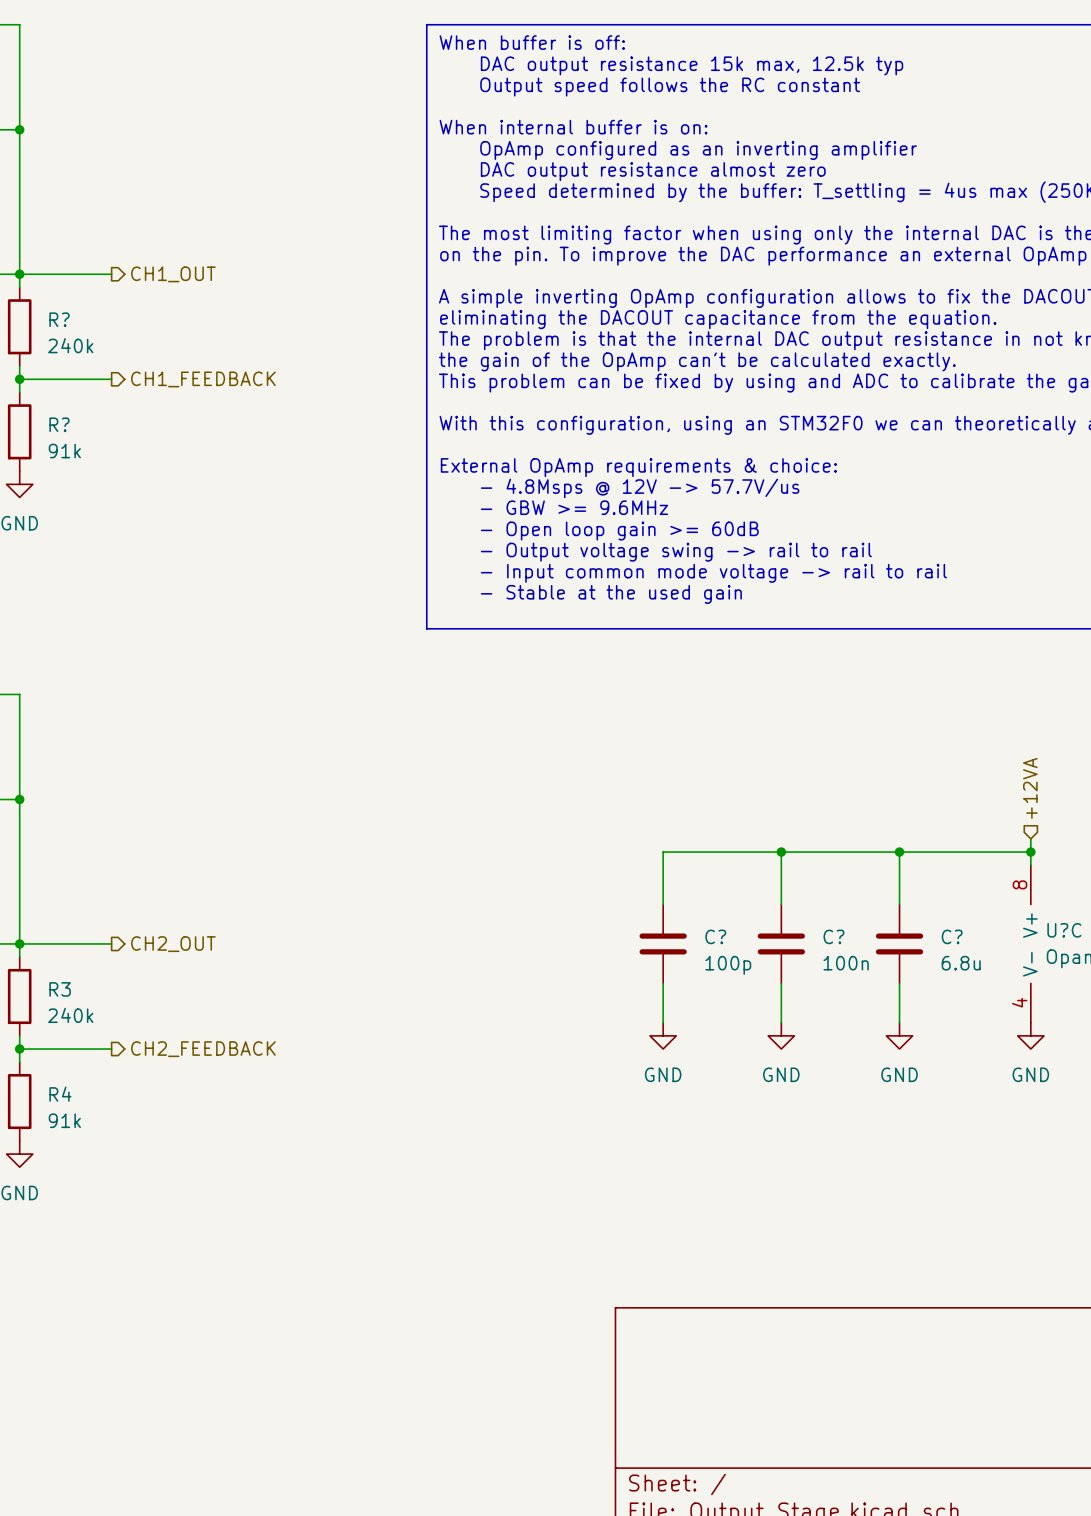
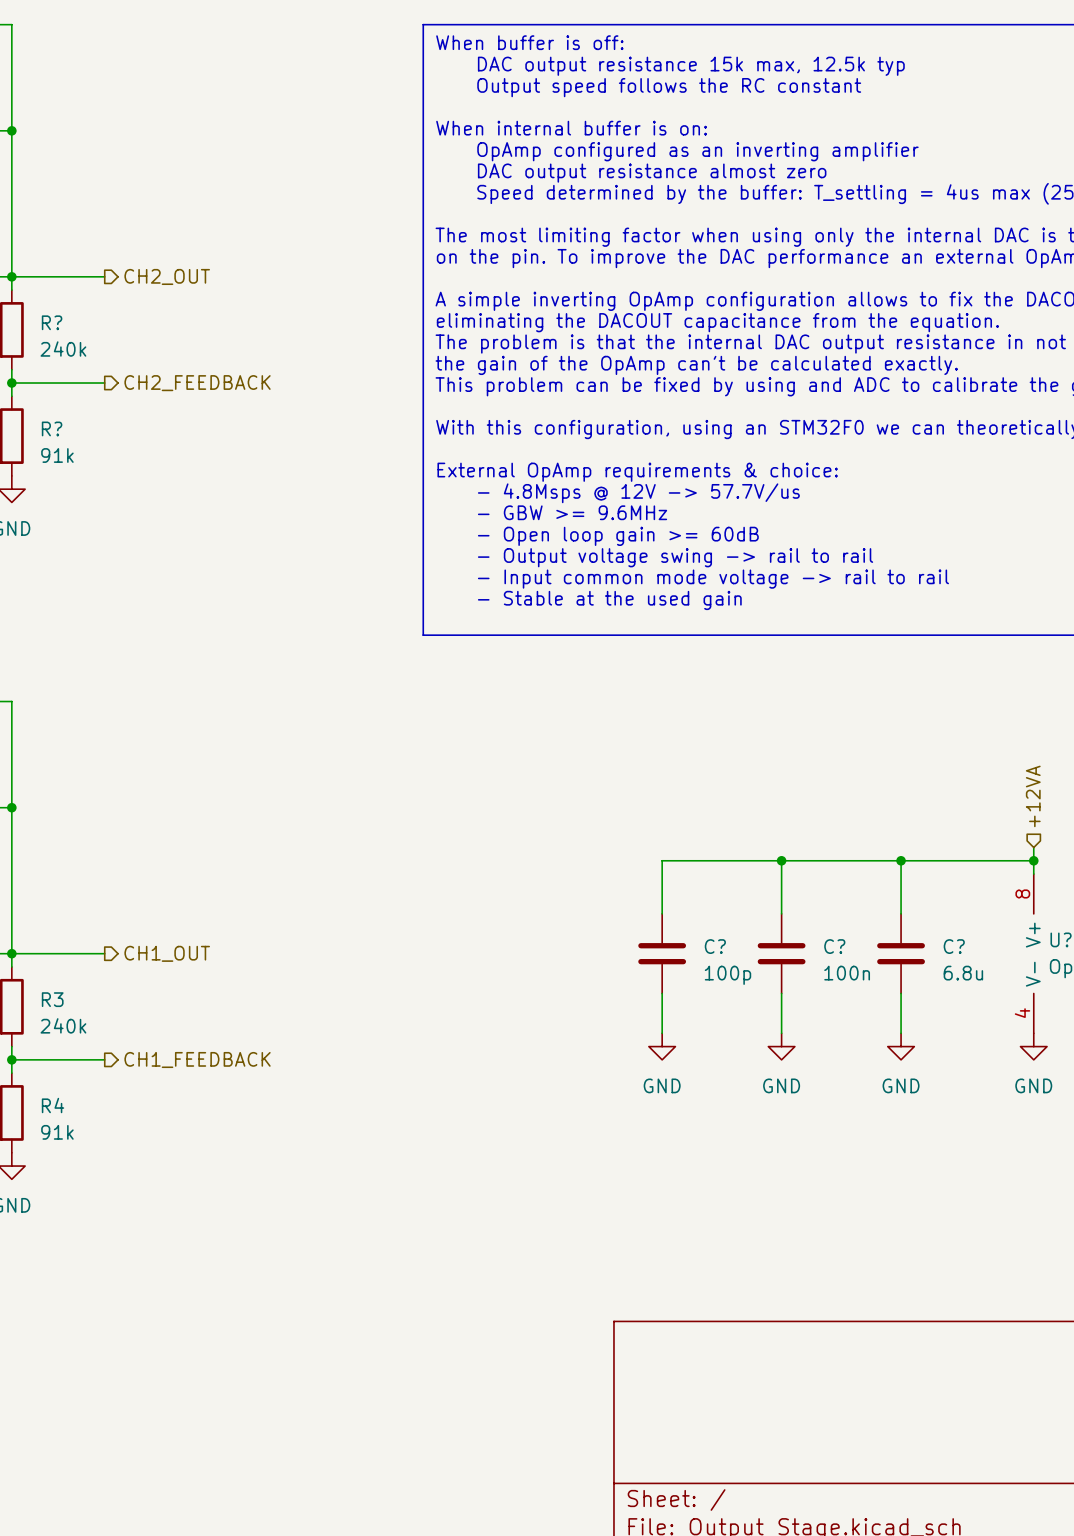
hierarchical label: CH1_OUT (173, 274) -> CH2_OUT (167, 276)
hierarchical label: CH1_FEEDBACK (203, 379) -> CH2_FEEDBACK (197, 383)
hierarchical label: CH2_OUT (173, 944) -> CH1_OUT (167, 953)
hierarchical label: CH2_FEEDBACK (203, 1049) -> CH1_FEEDBACK (197, 1060)

